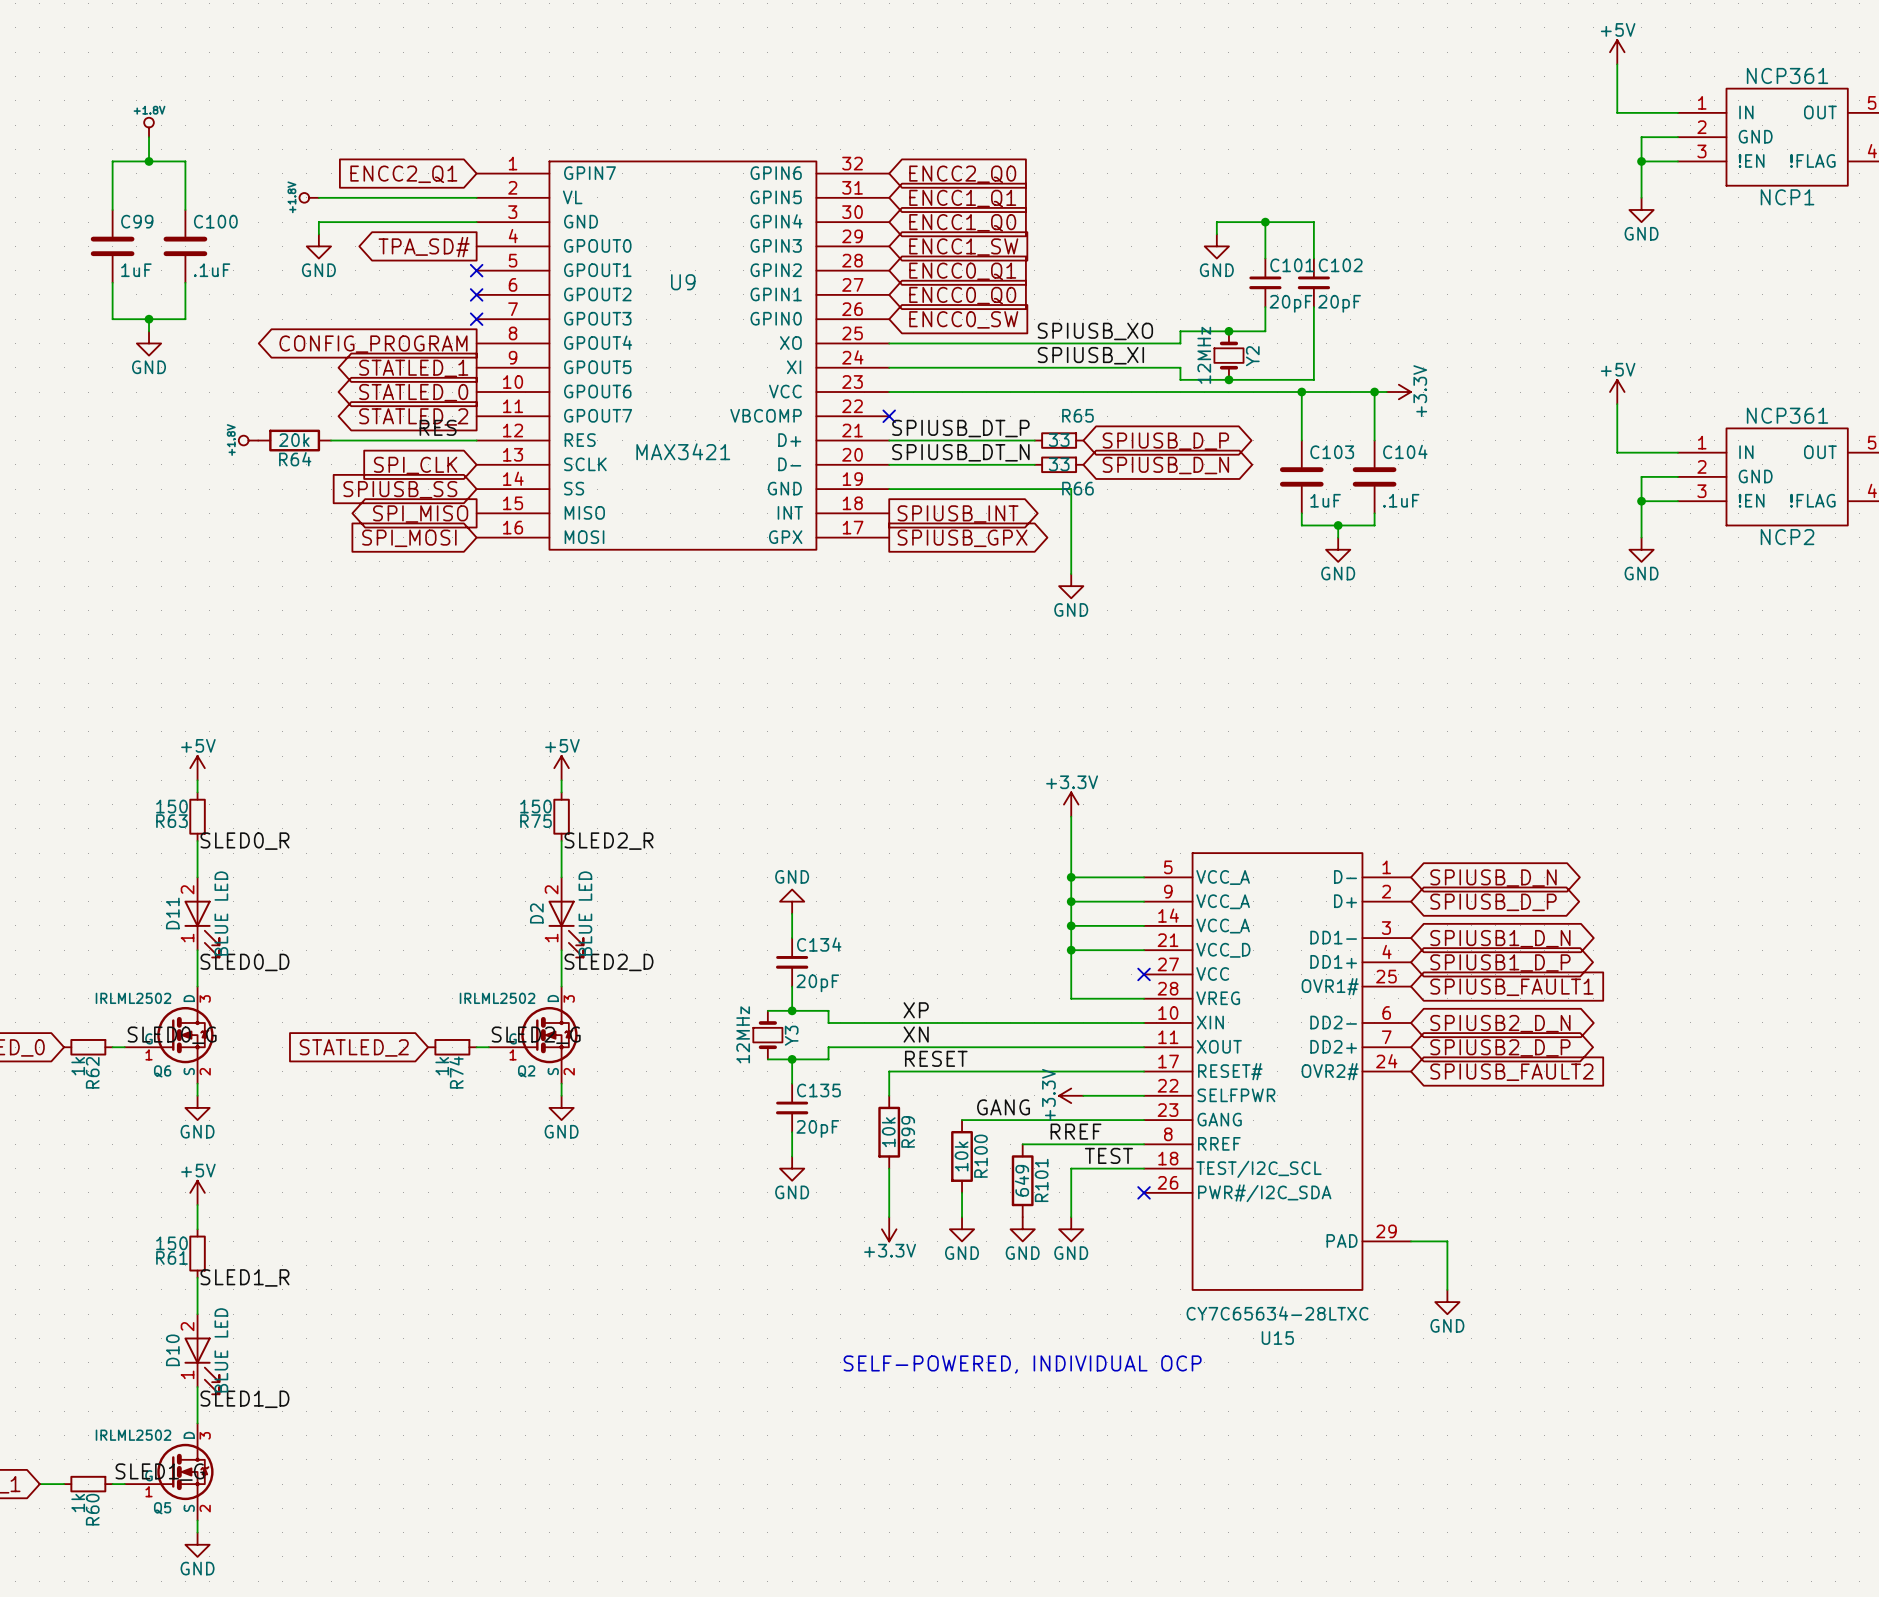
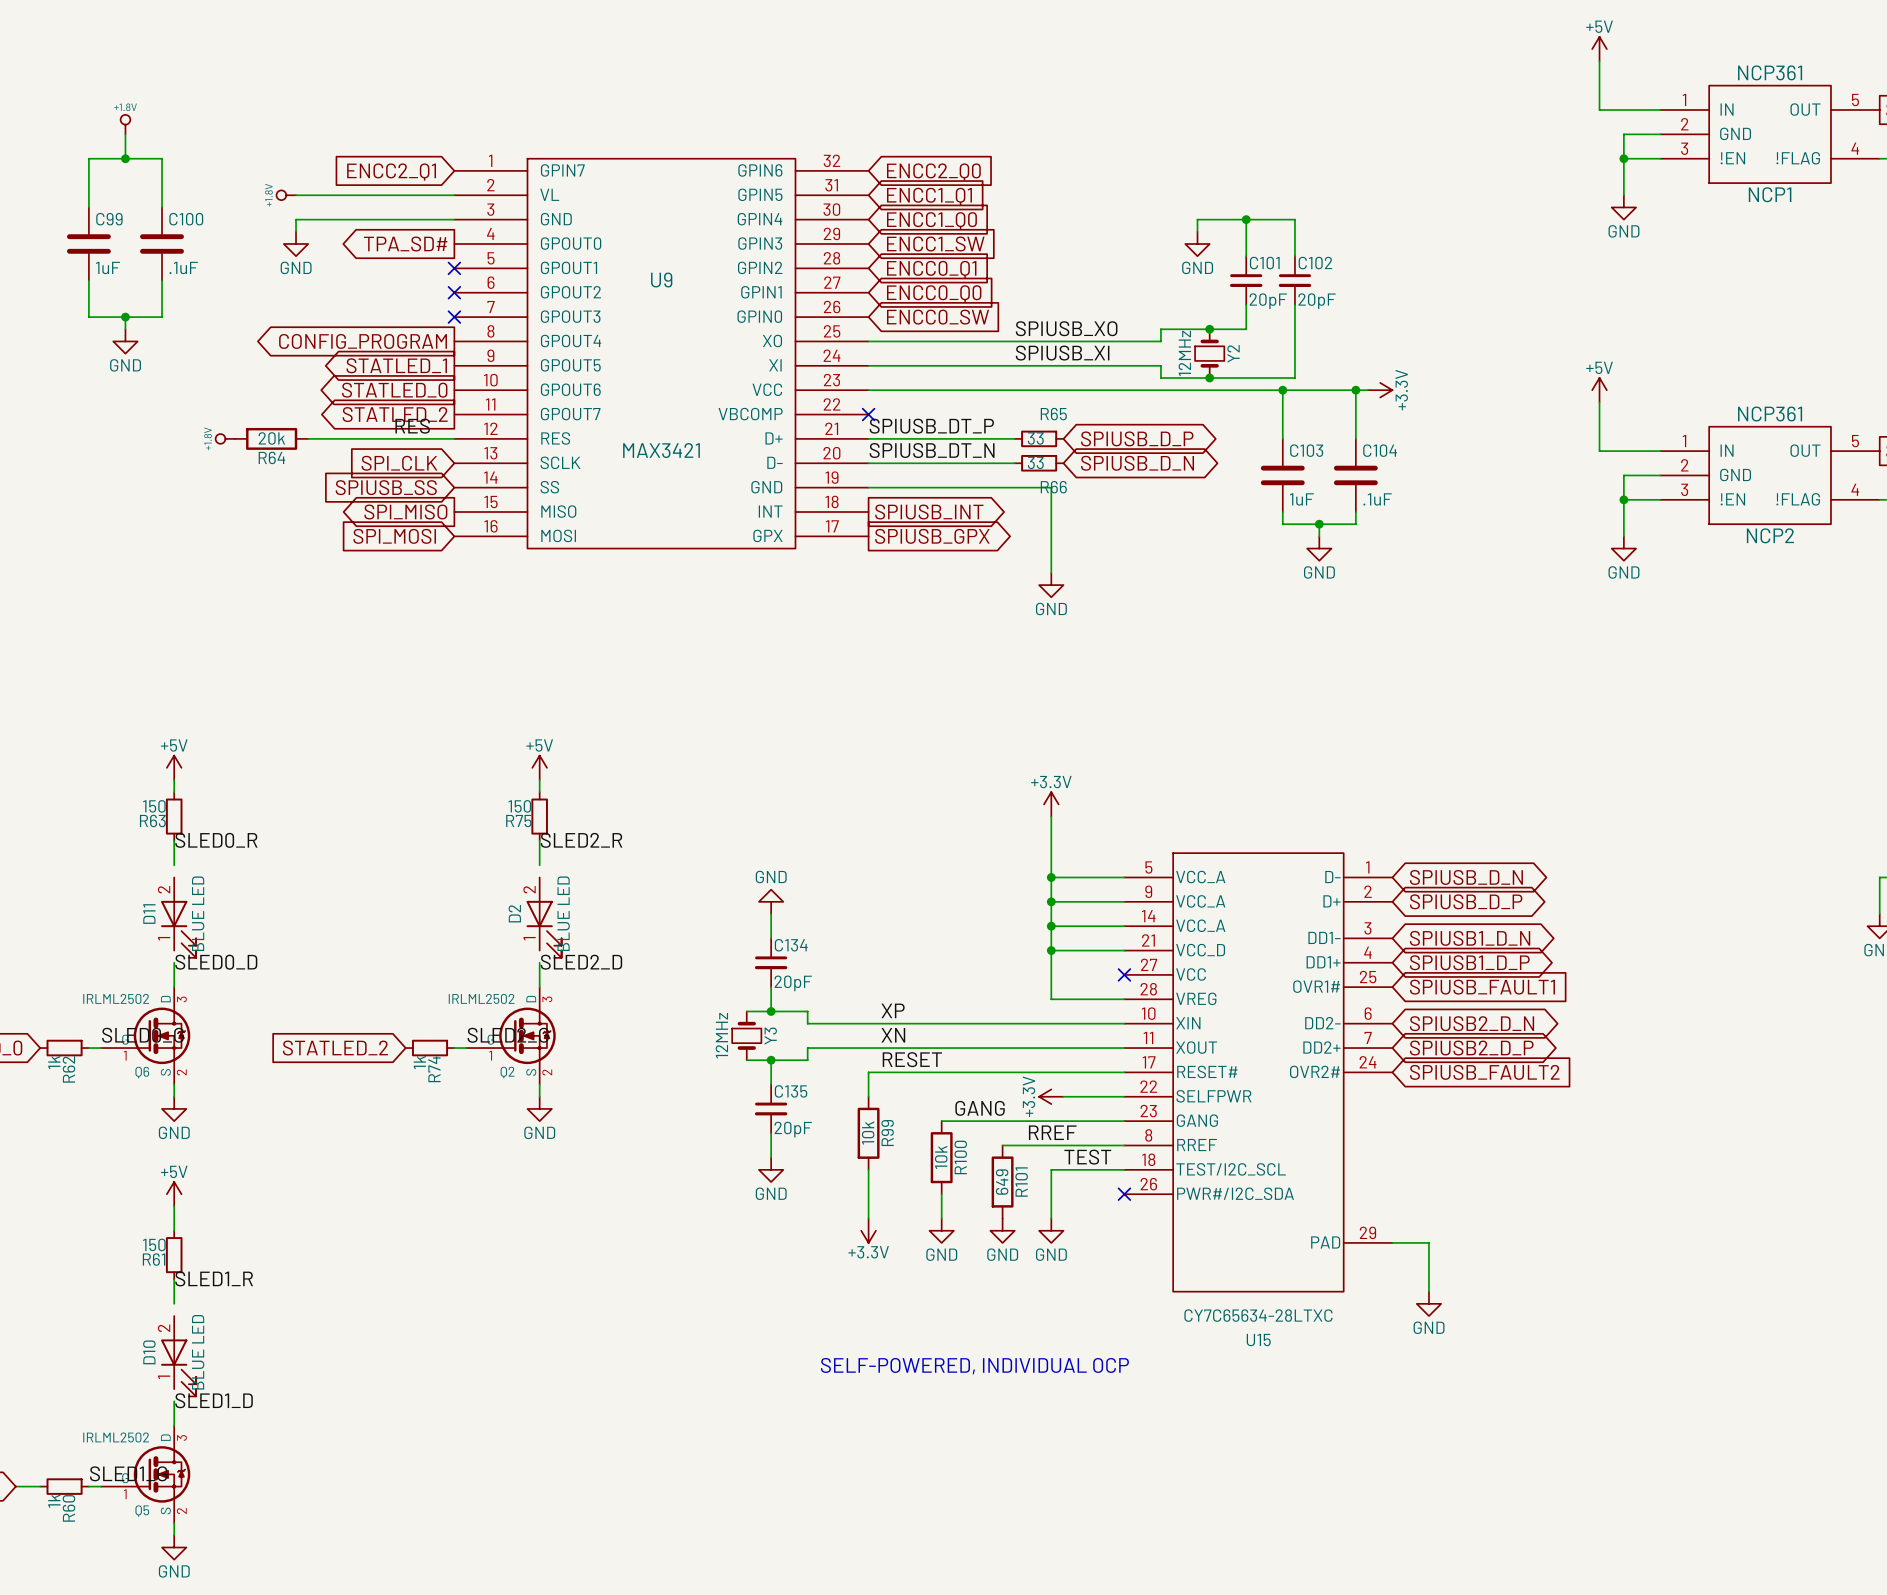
wire: (197, 865) (197, 877) -> none
wire: (561, 865) (561, 877) -> none
wire: (197, 950) (197, 962) -> none
wire: (561, 950) (561, 962) -> none
wire: (197, 1302) (197, 1314) -> none
wire: (197, 1387) (197, 1399) -> none

